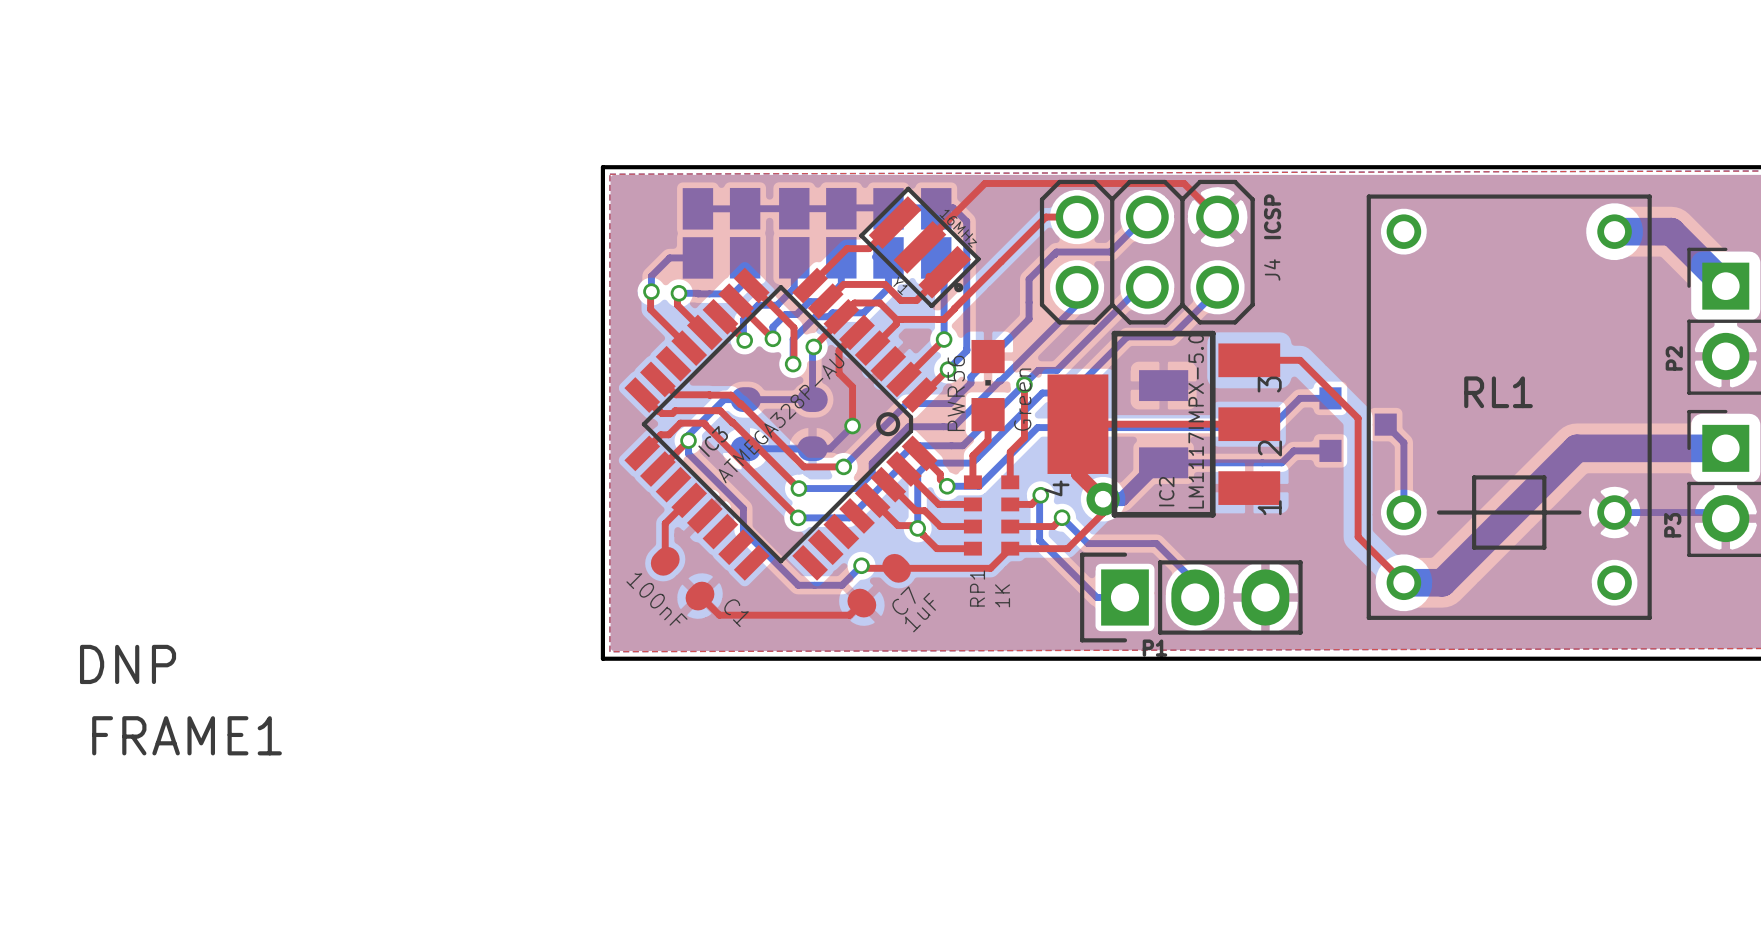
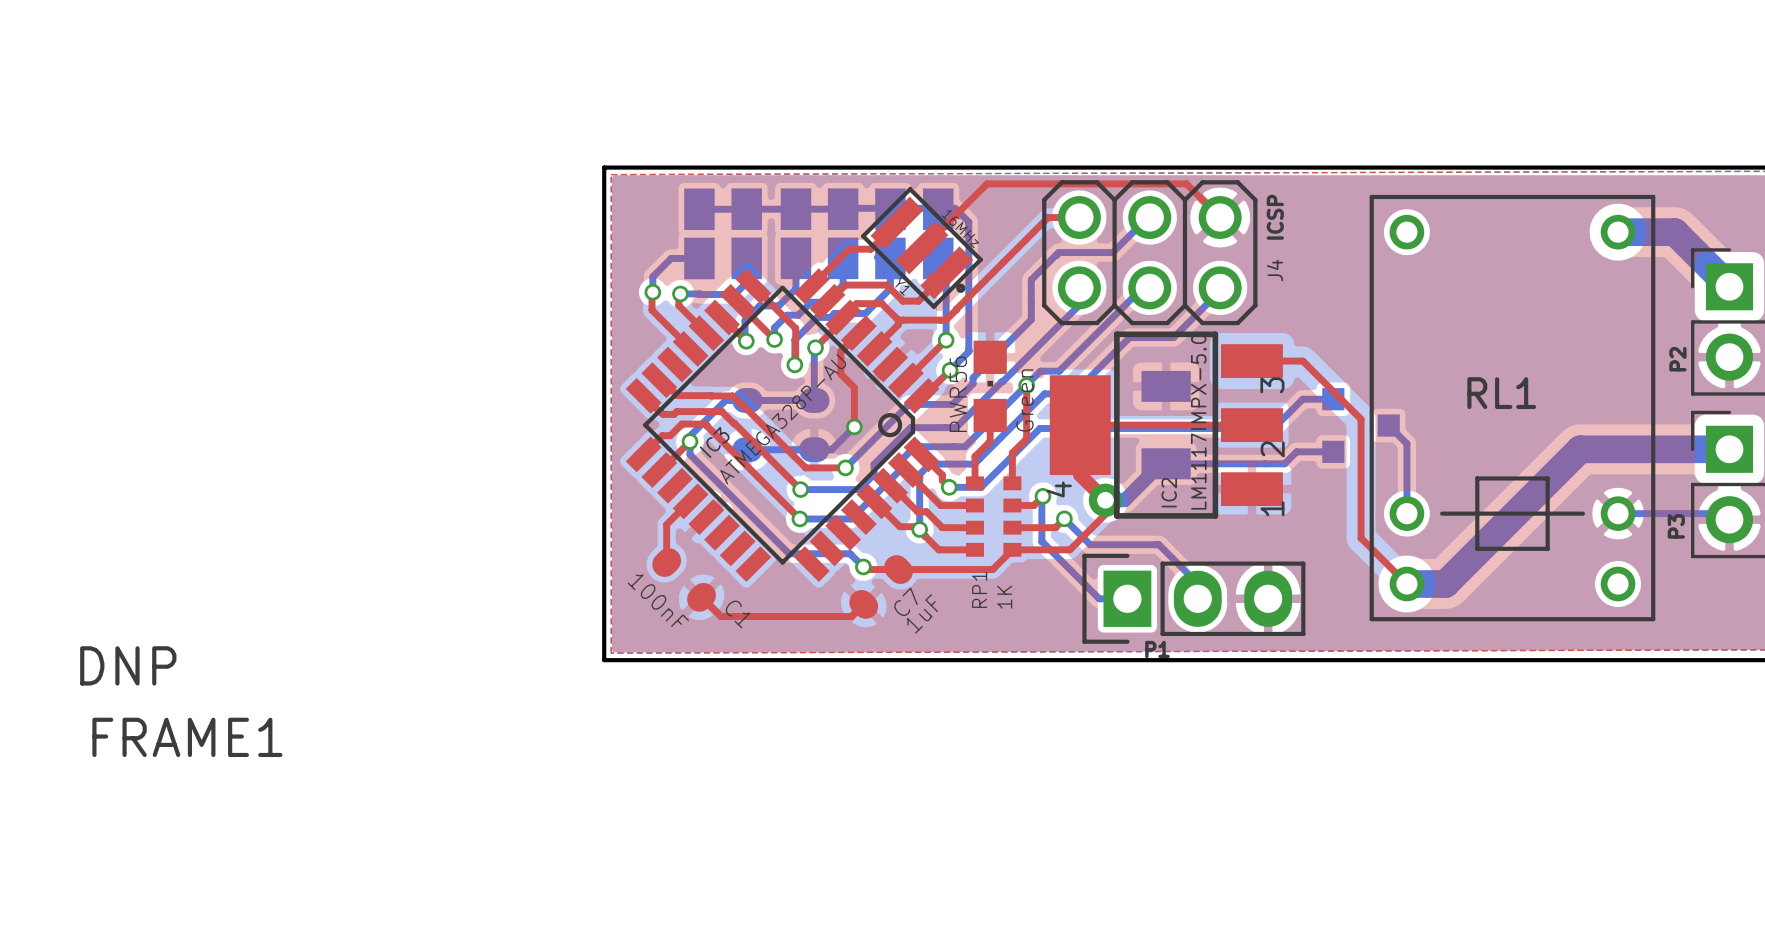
bottom track: (743, 508) (743, 530) (798, 585) (842, 585) (861, 565) -> (745, 509) (789, 553) (850, 553) (863, 566)

